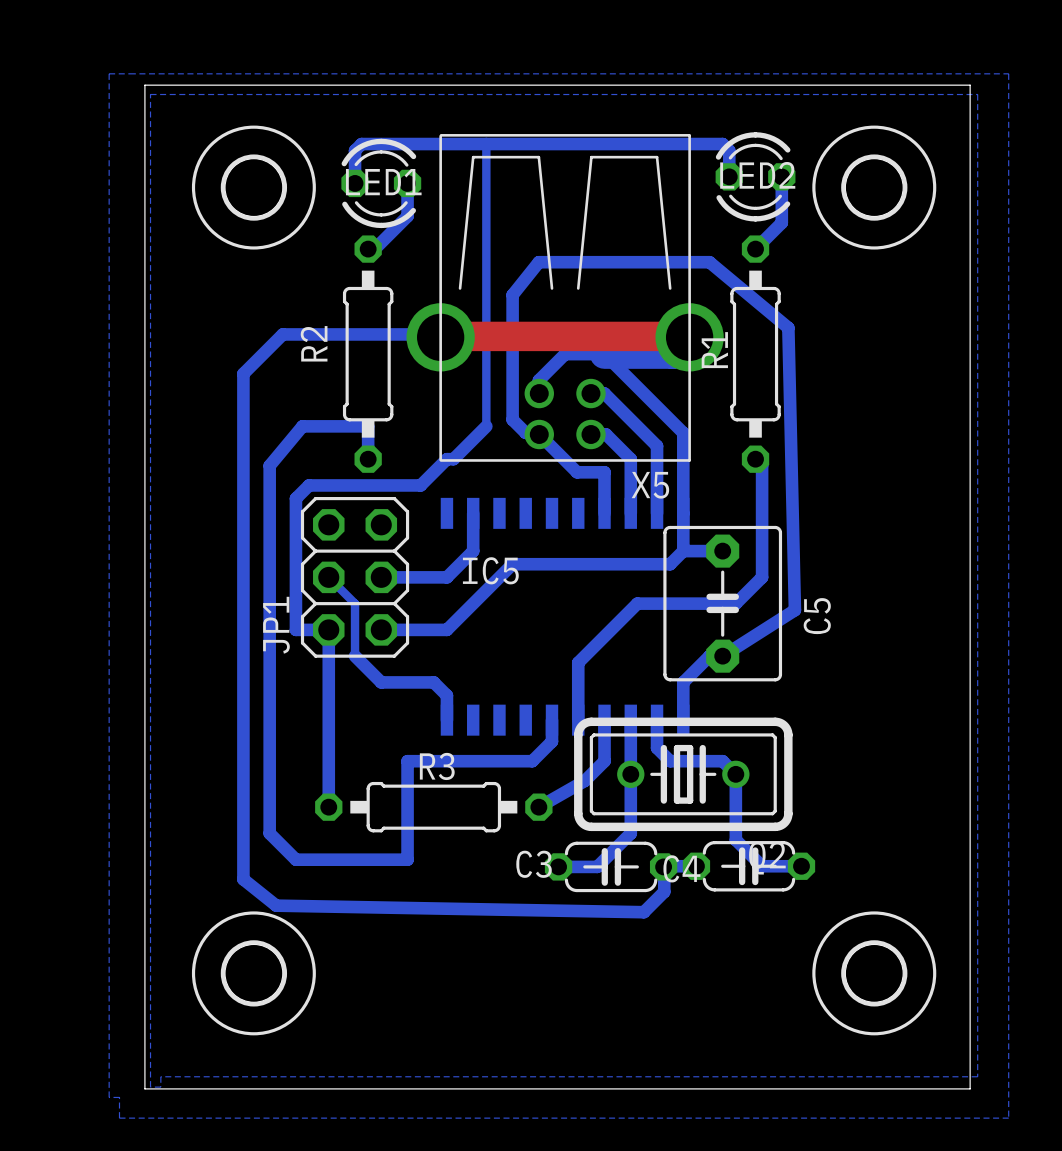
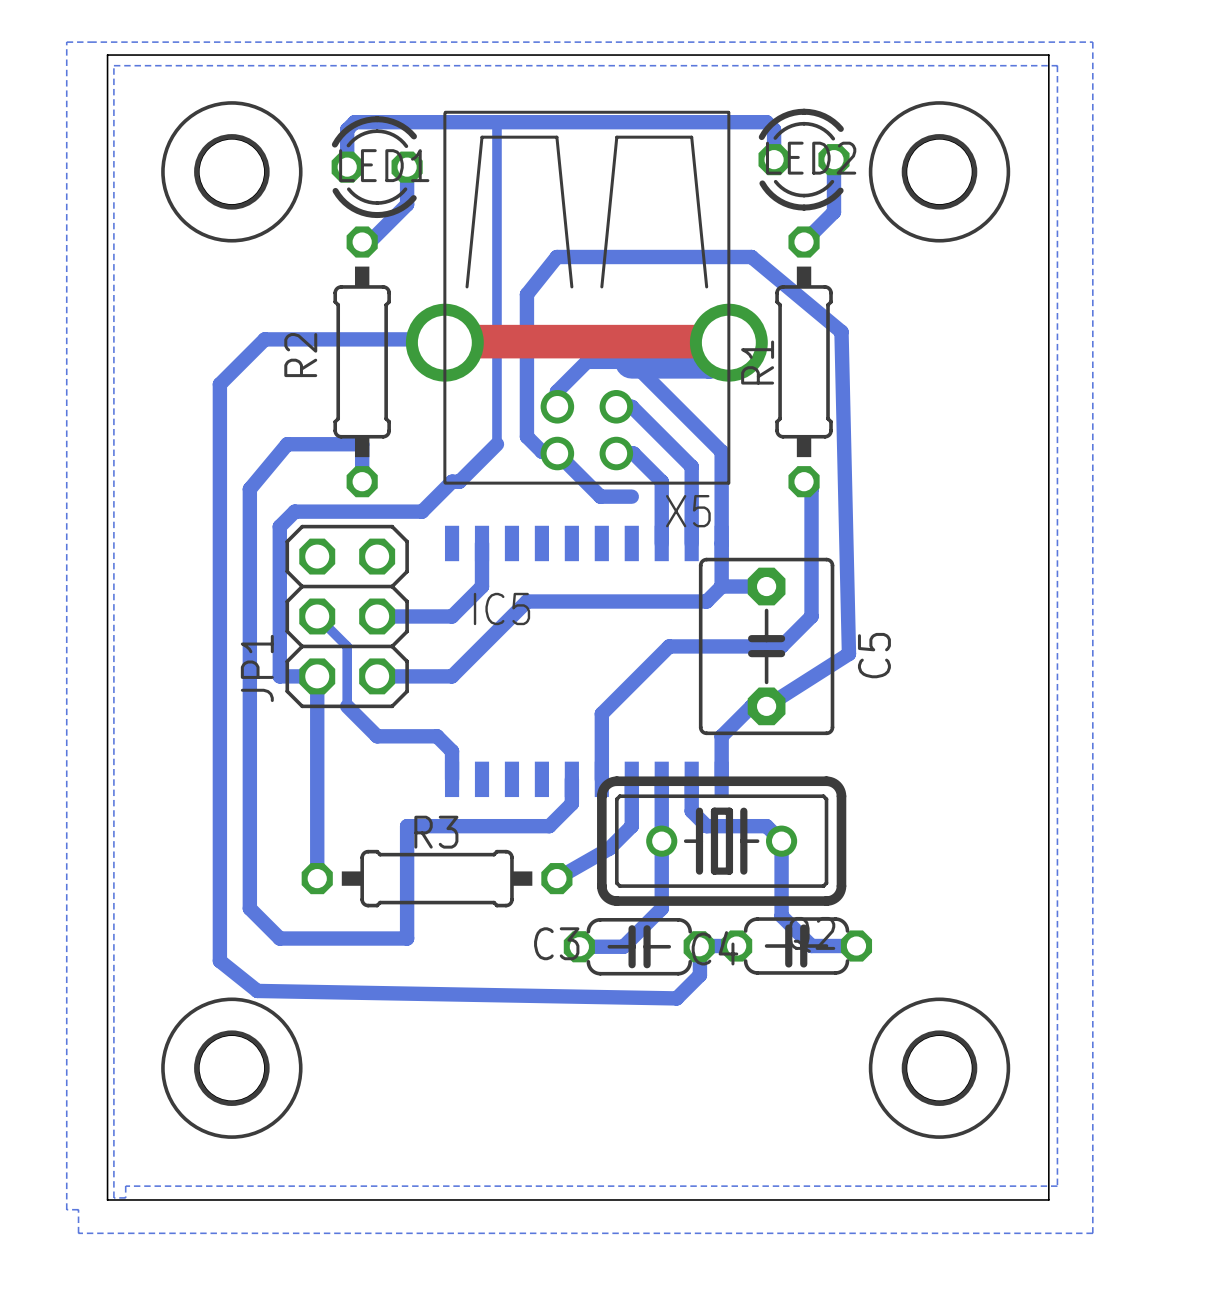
bottom track: (604, 472) (604, 513) -> none

